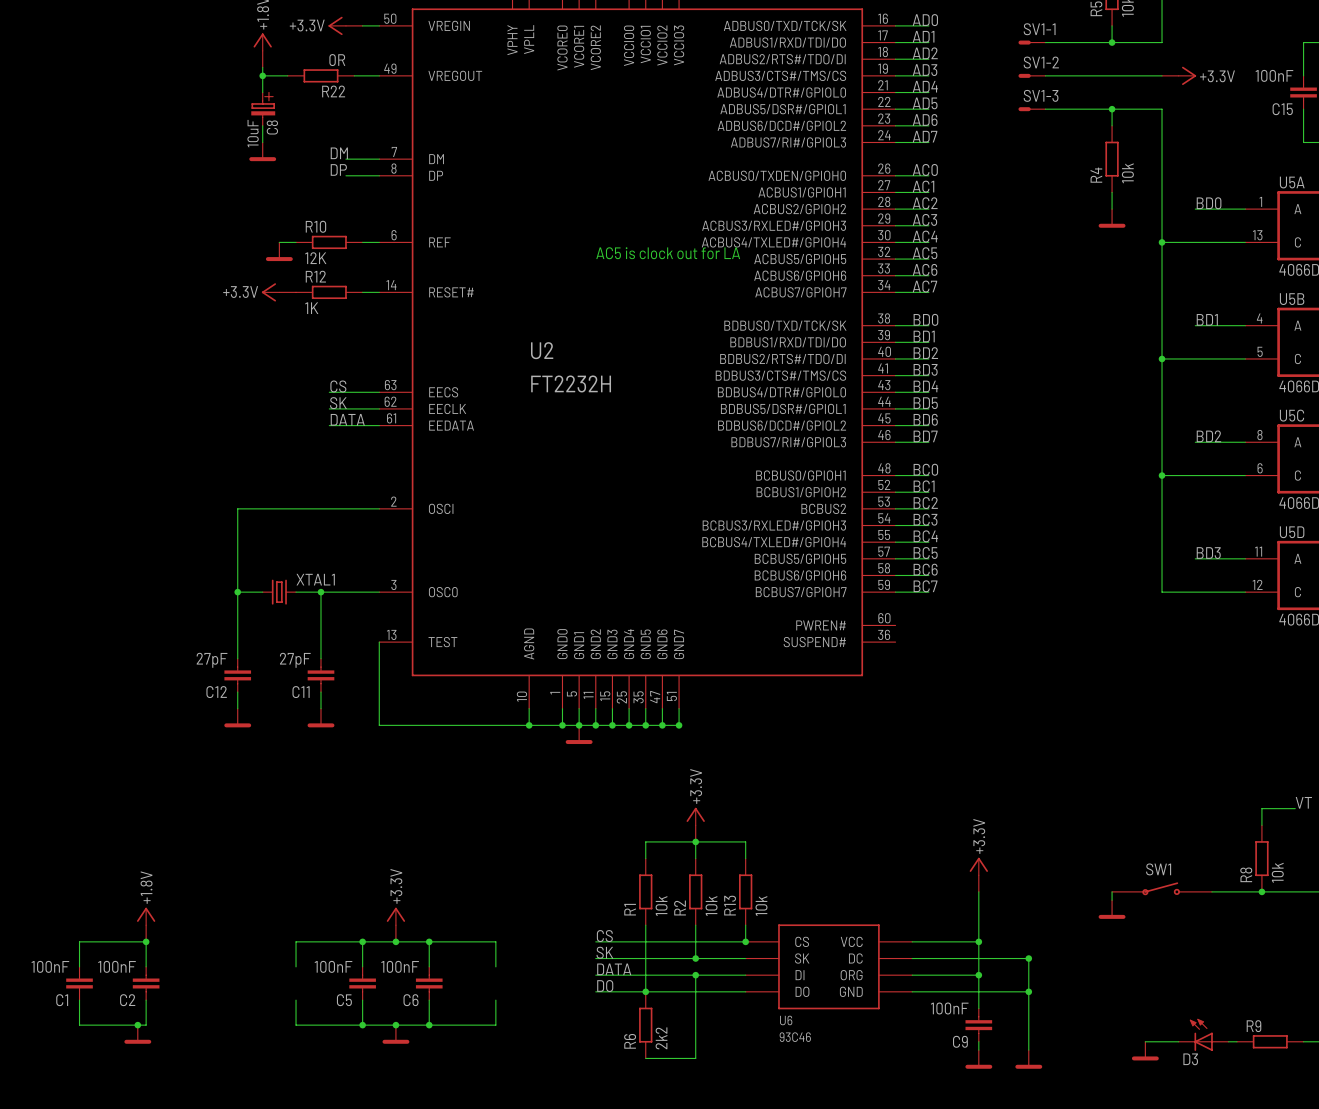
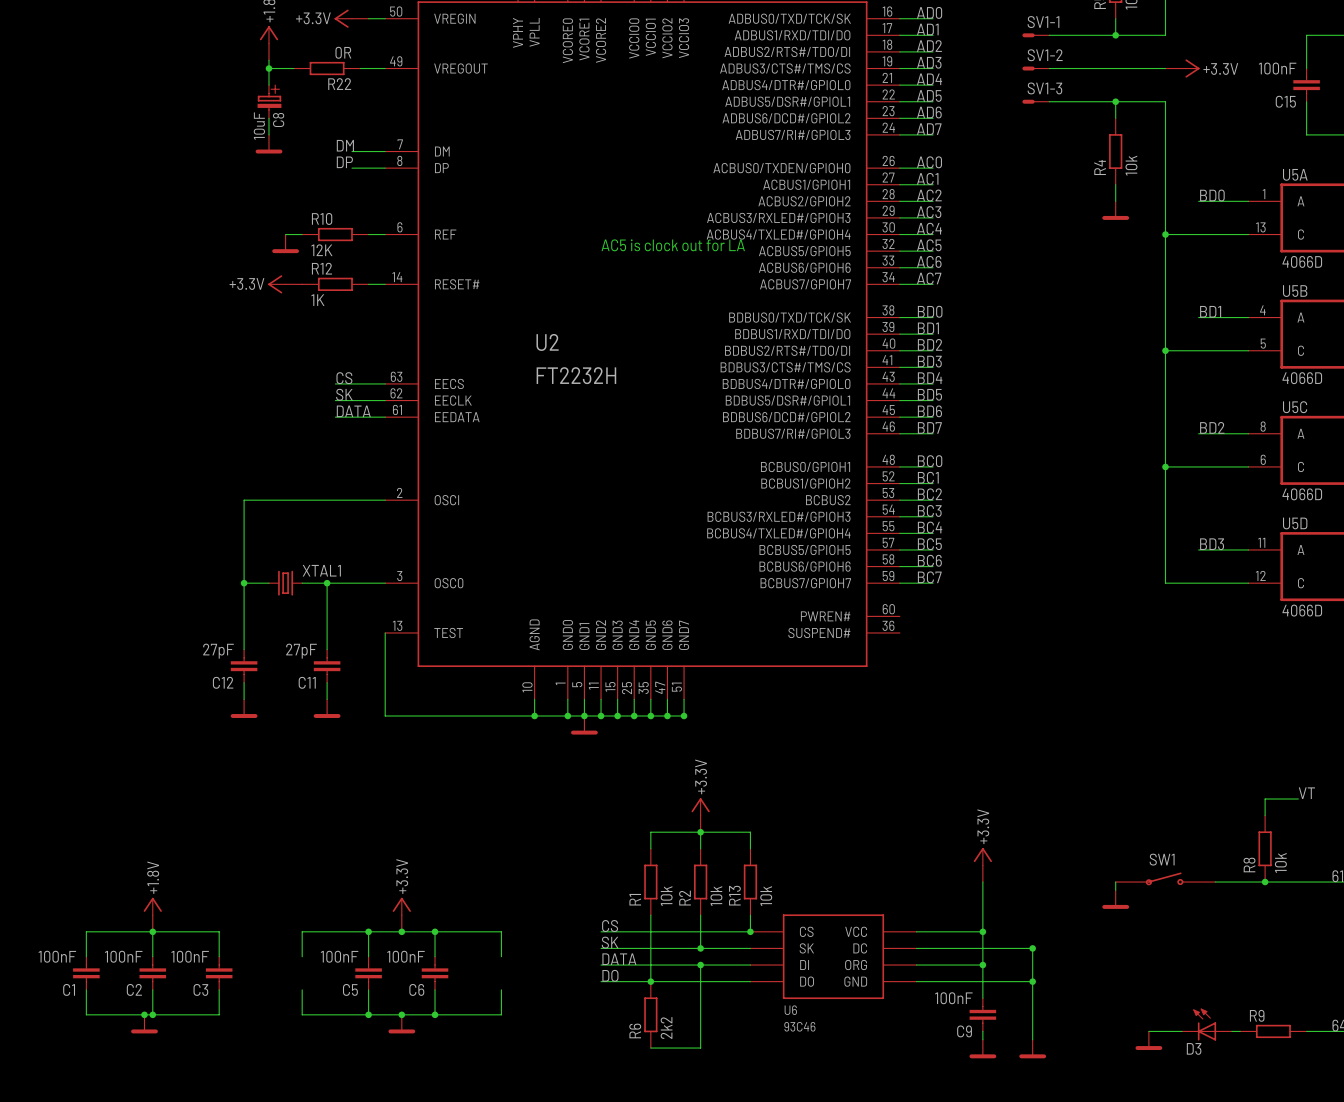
wire: none -> (152, 931) (219, 931) (219, 956)
C3: none -> 100nF (219, 973)
wire: none -> (219, 989) (219, 1014) (152, 1014)
junction: none -> (152, 1014)

